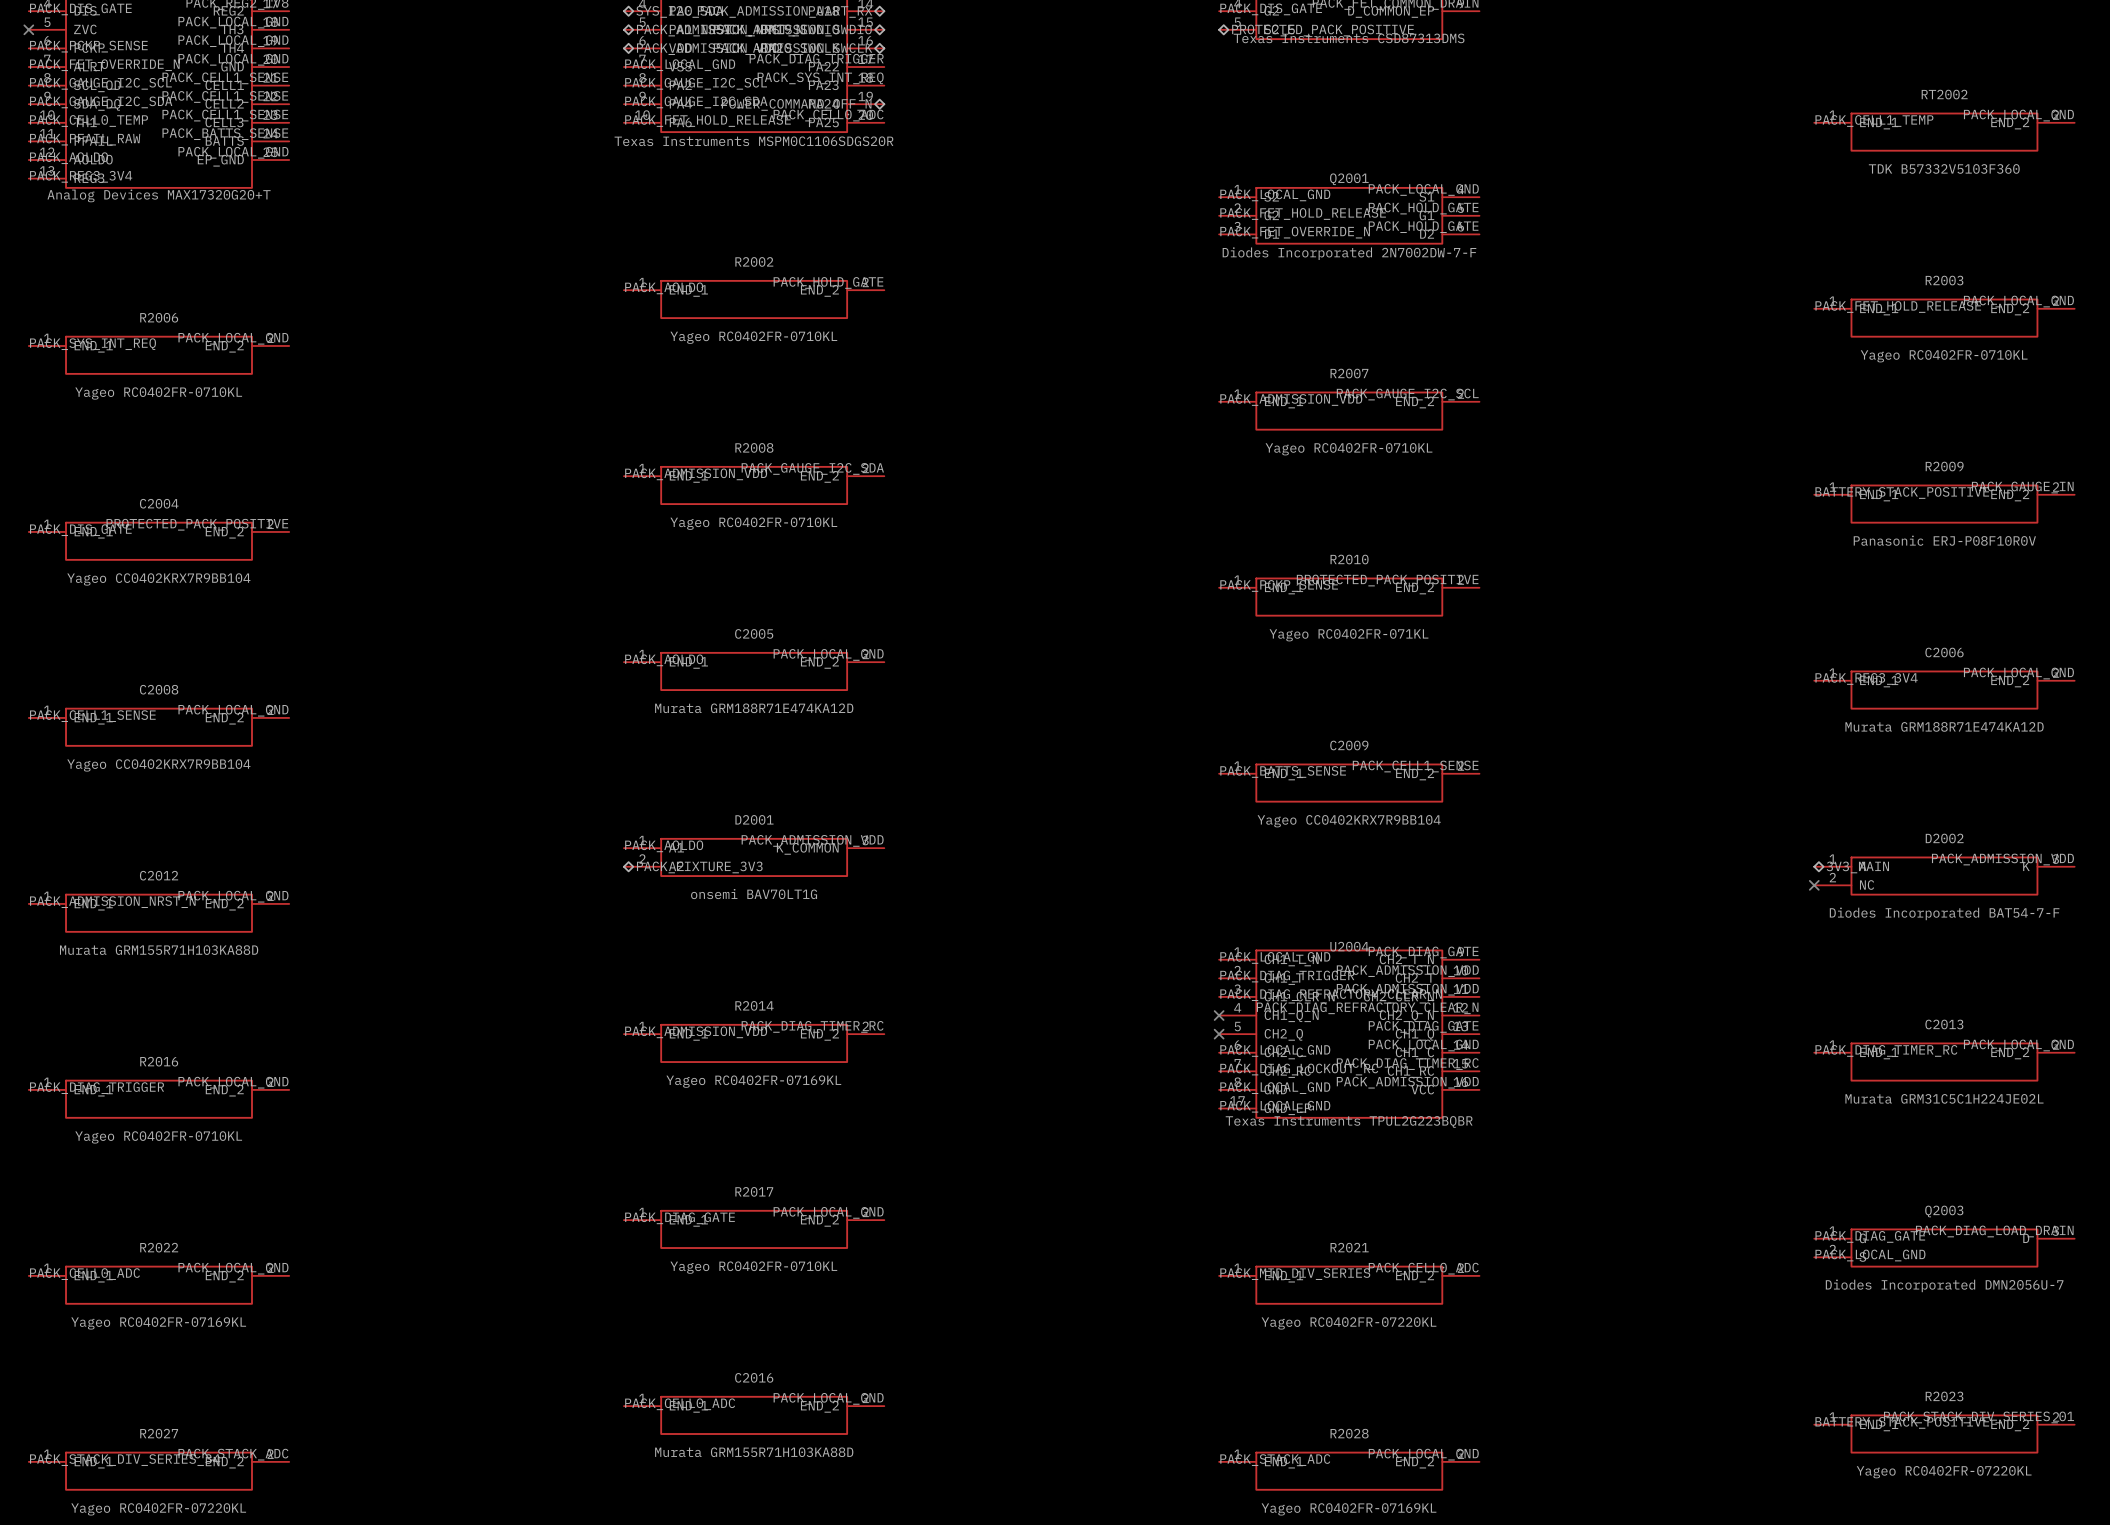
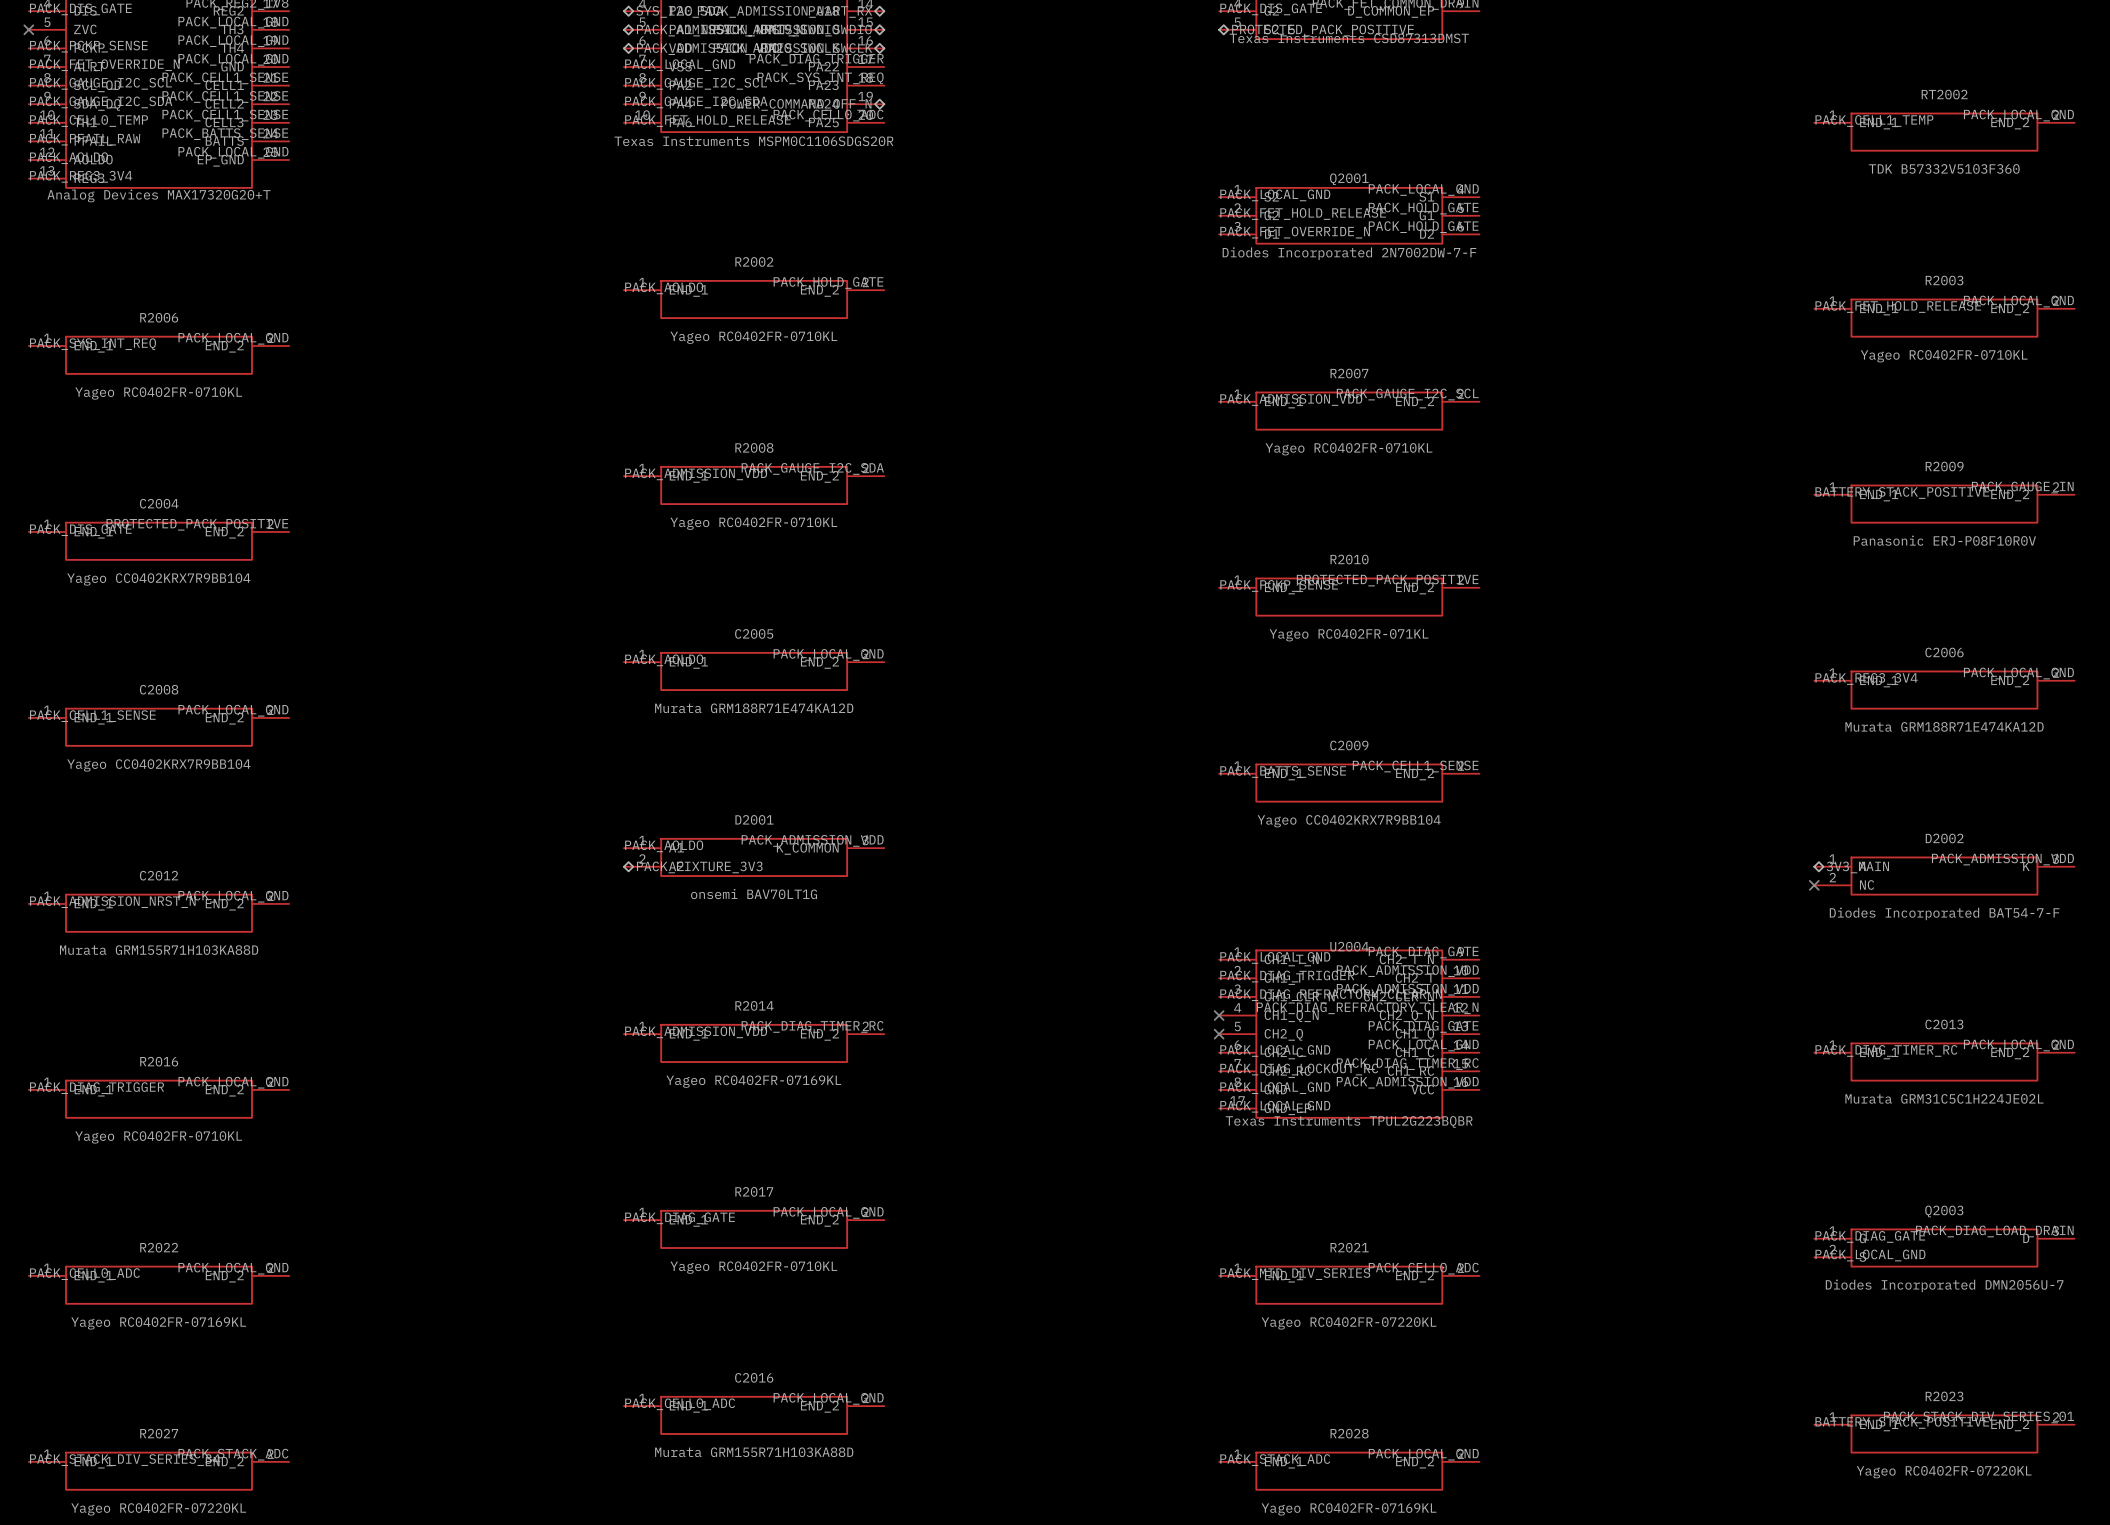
part value: Texas Instruments CSD87313DMS (1349, 38) -> Texas Instruments CSD87313DMST (1349, 38)

